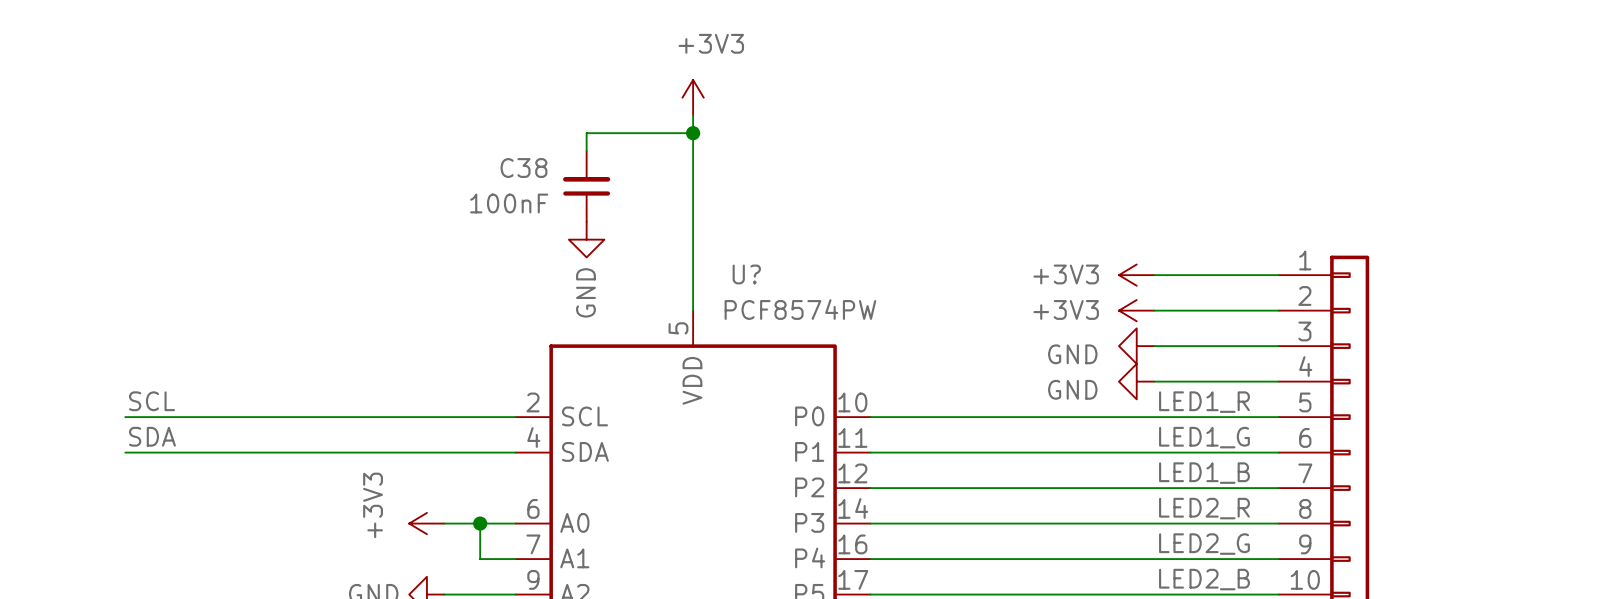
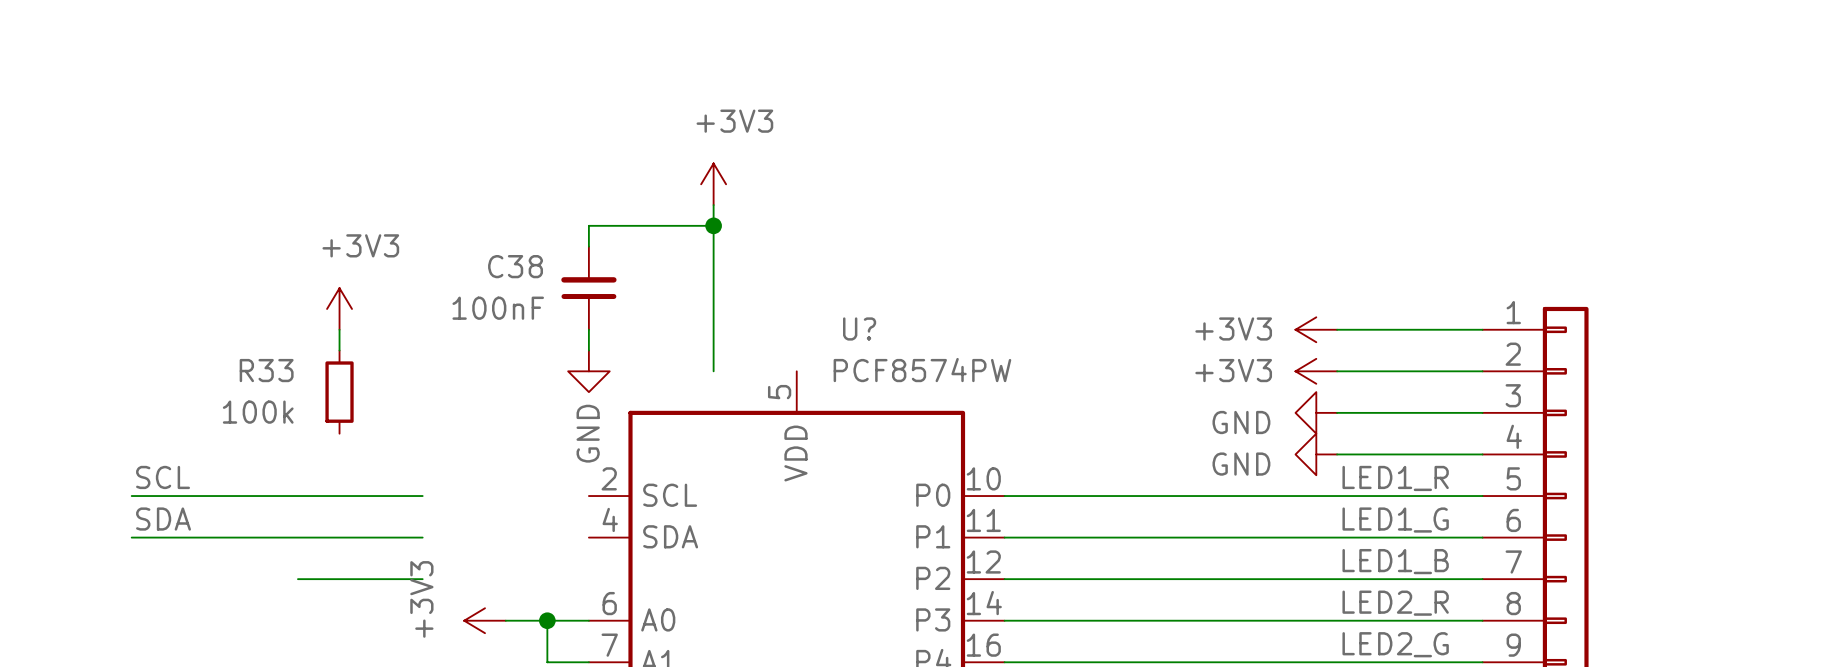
power symbol position: +3V3 (693, 97) -> +3V3 (713, 184)
wire: (693, 115) (693, 310) -> none
wire: (693, 133) (586, 133) (586, 150) -> (713, 225) (588, 225) (588, 246)
junction: (693, 133) -> none
wire: none -> (713, 205) (713, 371)
C38 position: (586, 186) -> (588, 288)
junction: none -> (713, 225)
power symbol position: GND (586, 239) -> GND (588, 371)
power symbol: none -> +3V3 (339, 308)
wire: none -> (339, 329) (339, 350)
wire: none -> (588, 329) (588, 350)
R33: none -> 100k (339, 392)
wire: (373, 417) (515, 417) -> none
wire: (373, 452) (515, 452) -> none
wire: none -> (297, 579) (422, 579)

